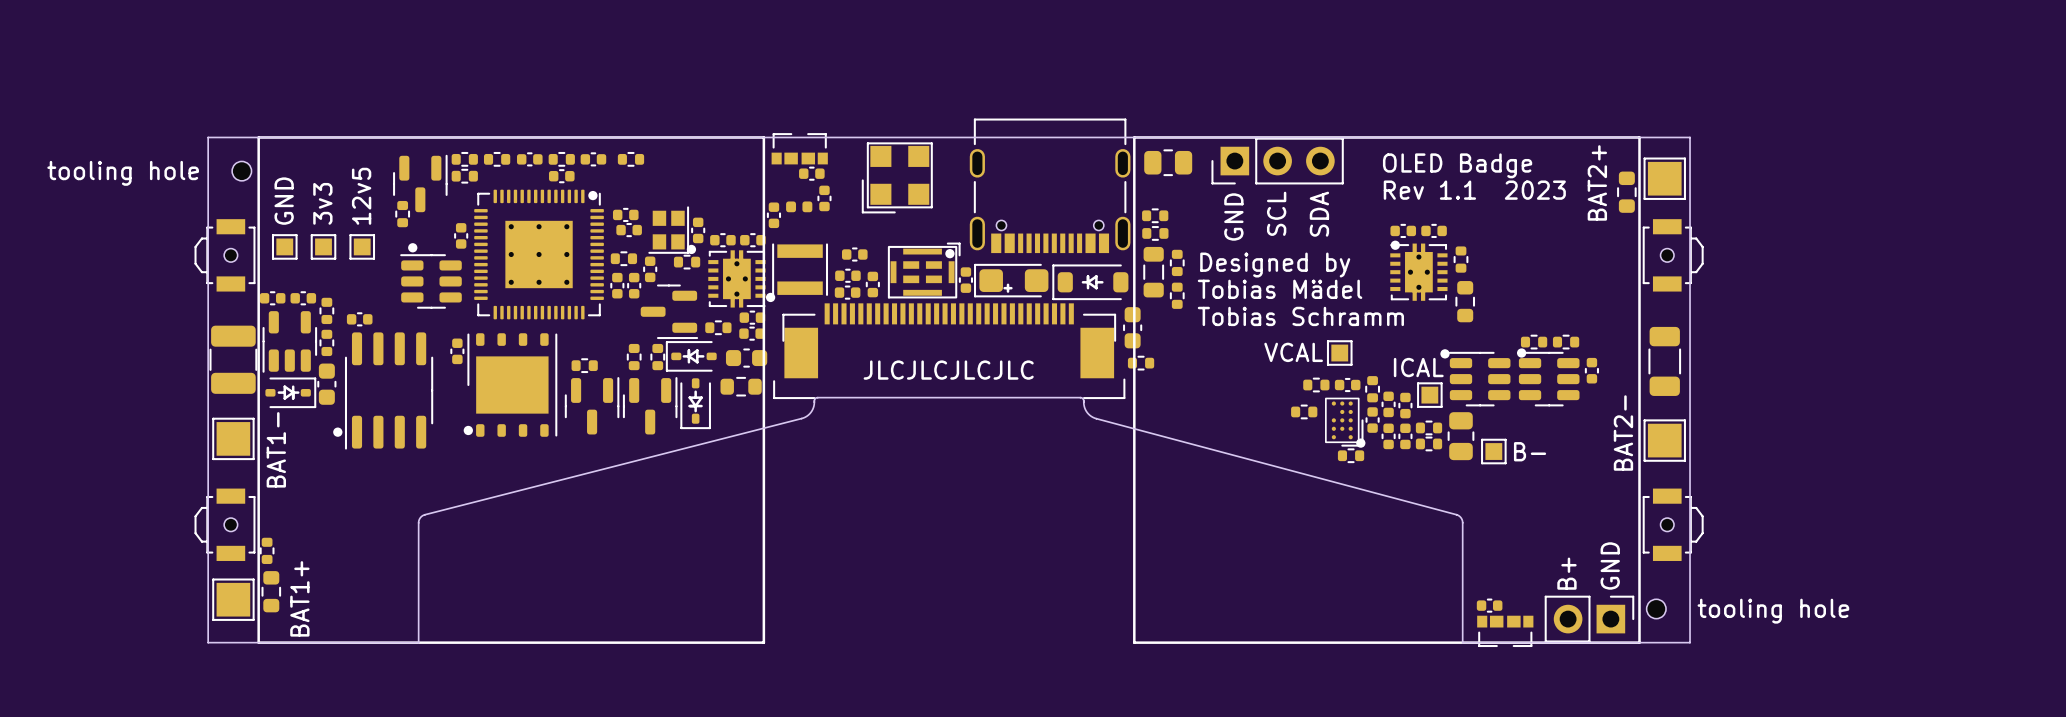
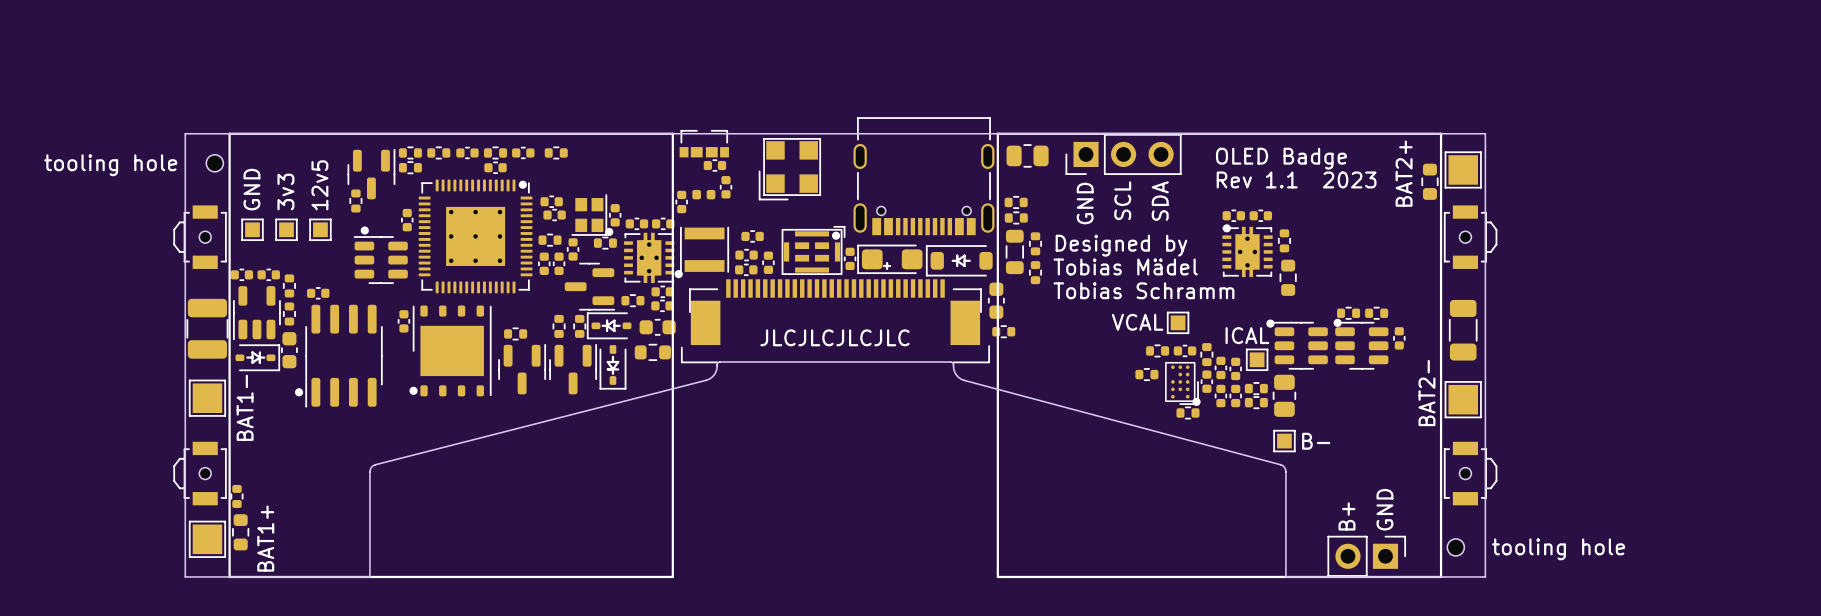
part position: (1493, 451) -> (1284, 441)
text position: B- (1530, 451) -> B- (1316, 441)
text: GND (1610, 565) -> none
text: none -> B+ (1346, 516)
text: B+ (1566, 573) -> GND (1384, 509)
part: (1489, 605) -> none
part position: (1589, 619) -> (1366, 556)
part: (1505, 631) -> none

